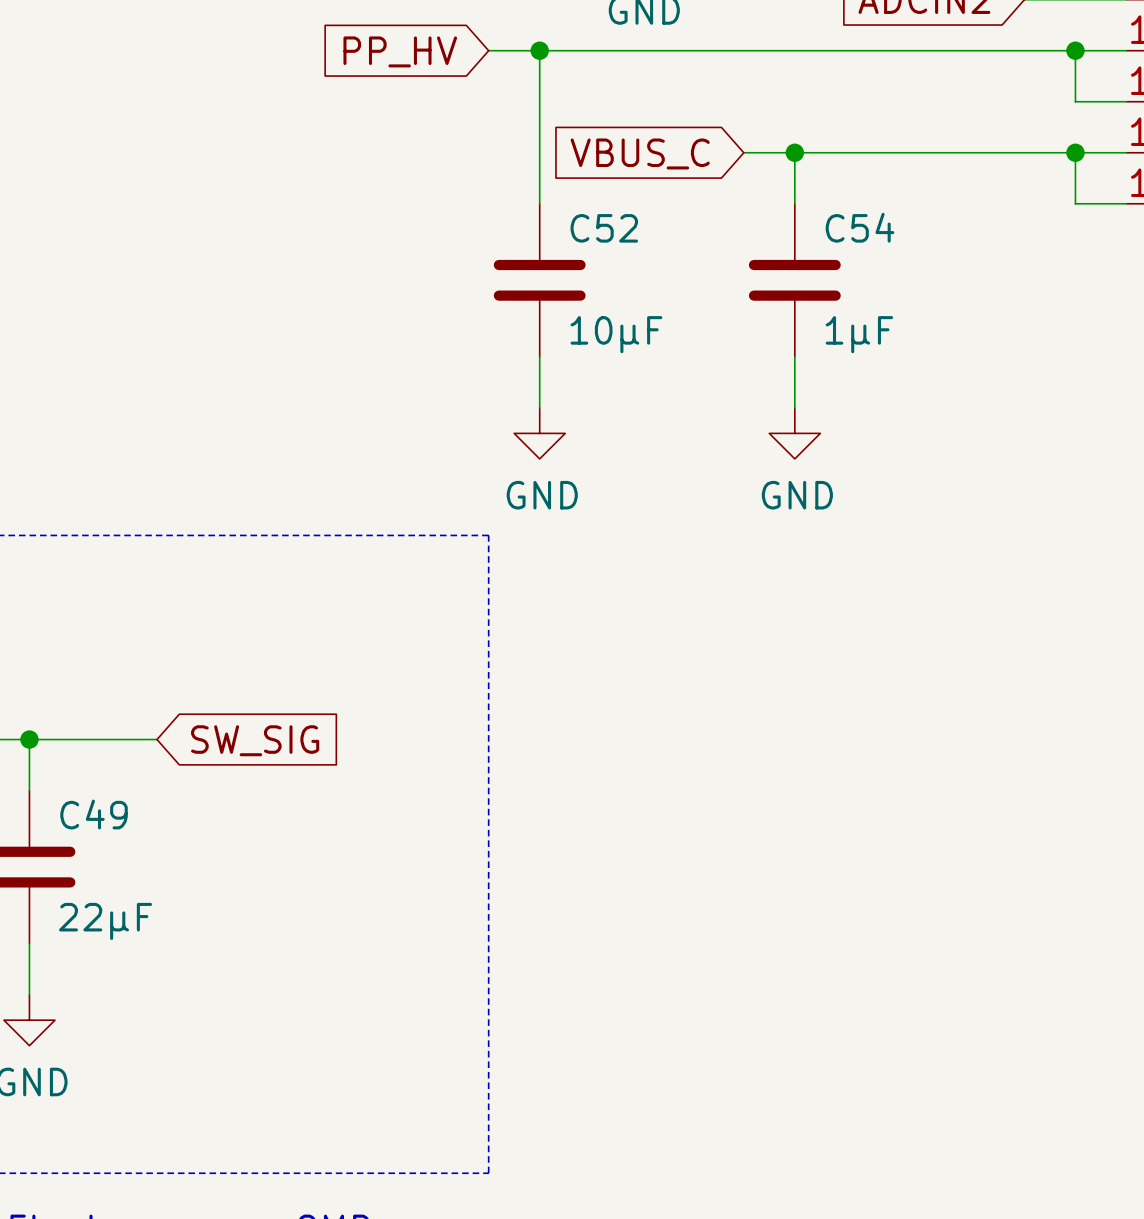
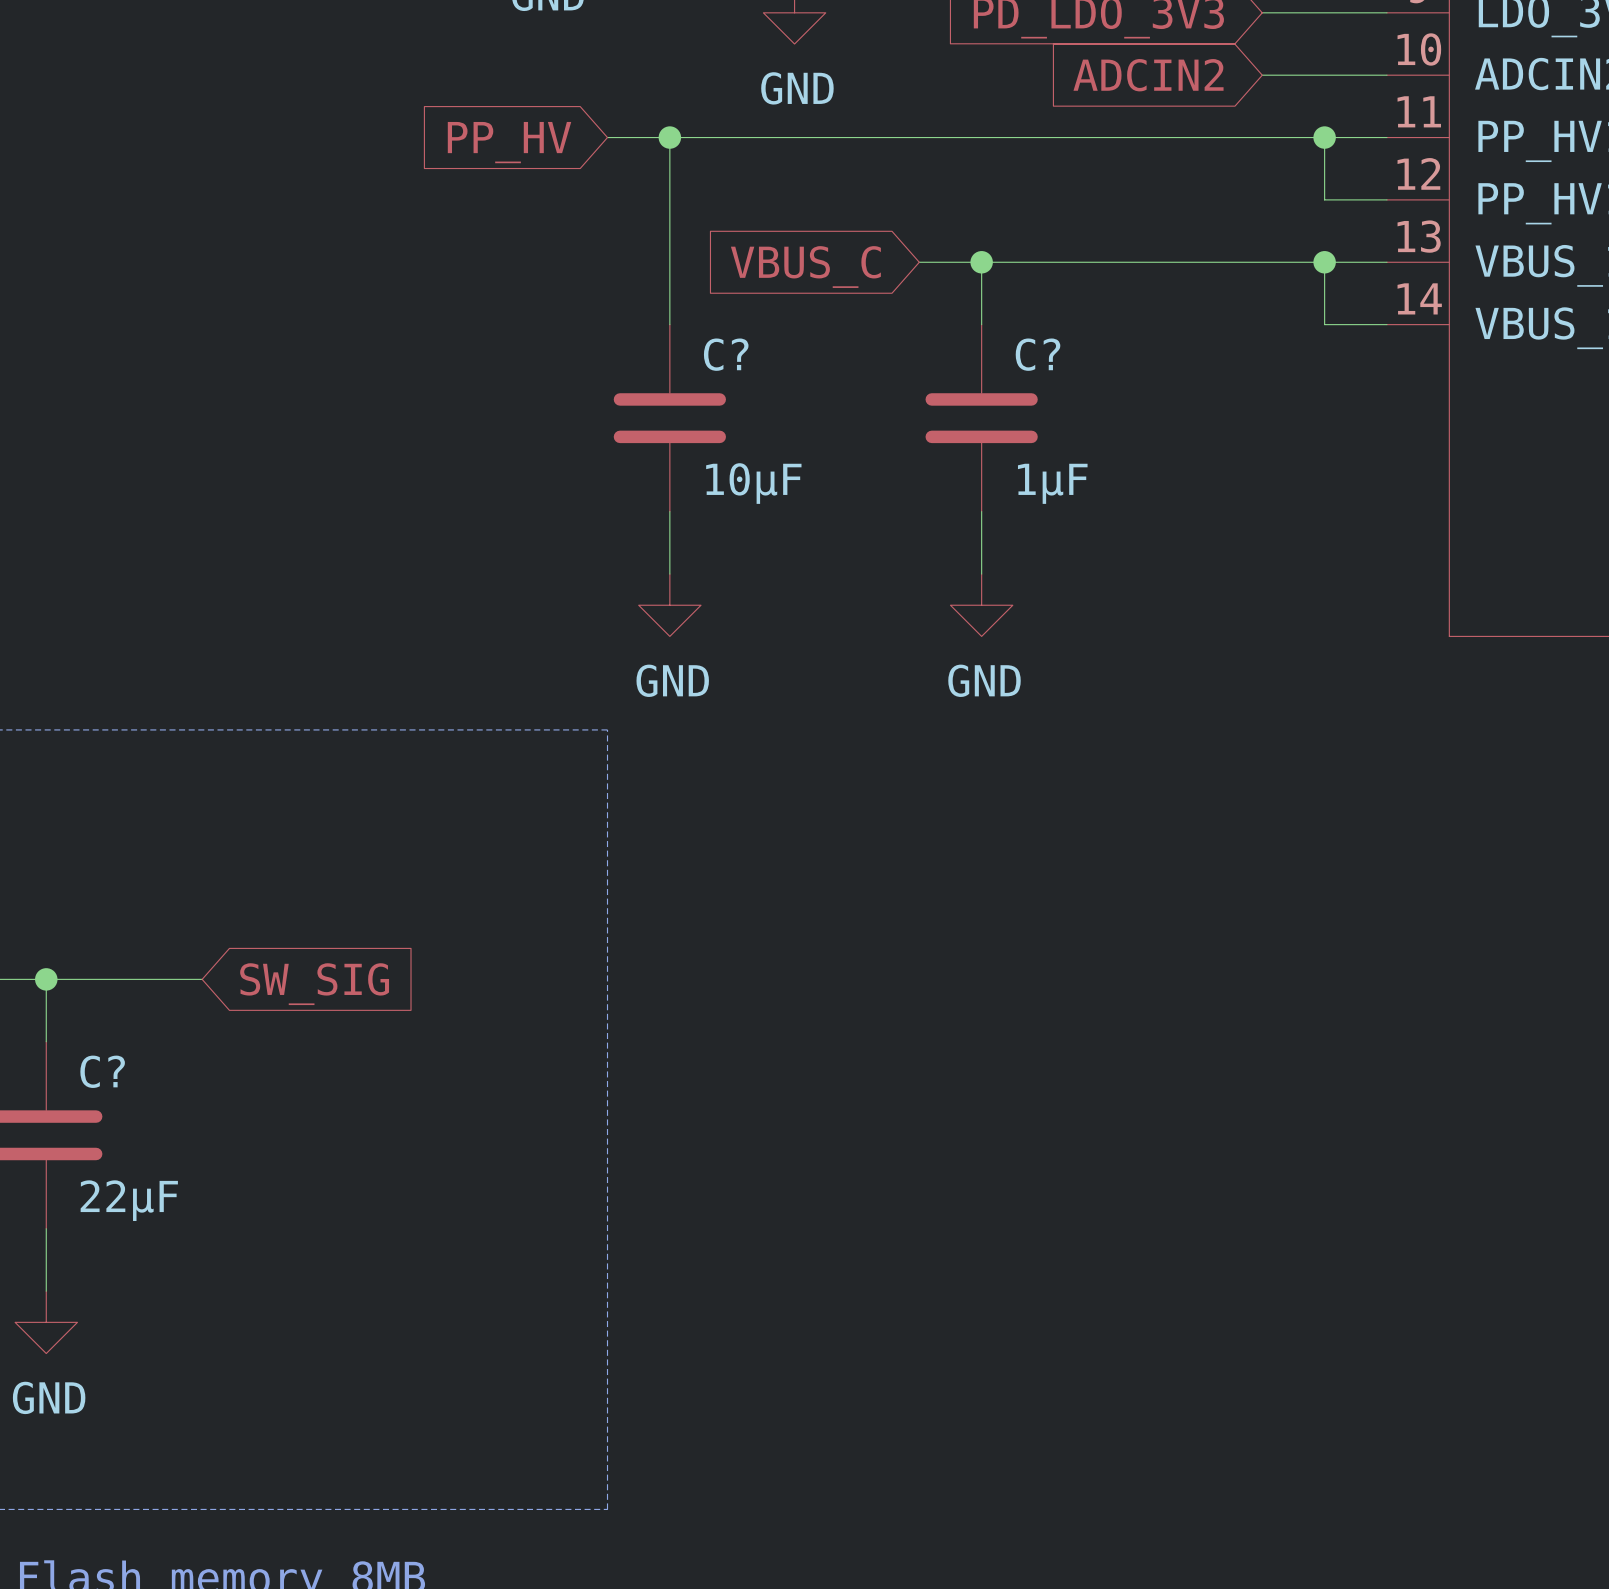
C54 name: C54 (860, 227) -> C? (1038, 354)
C52 name: C52 (604, 228) -> C? (726, 354)
C49 name: C49 (94, 814) -> C? (102, 1071)

